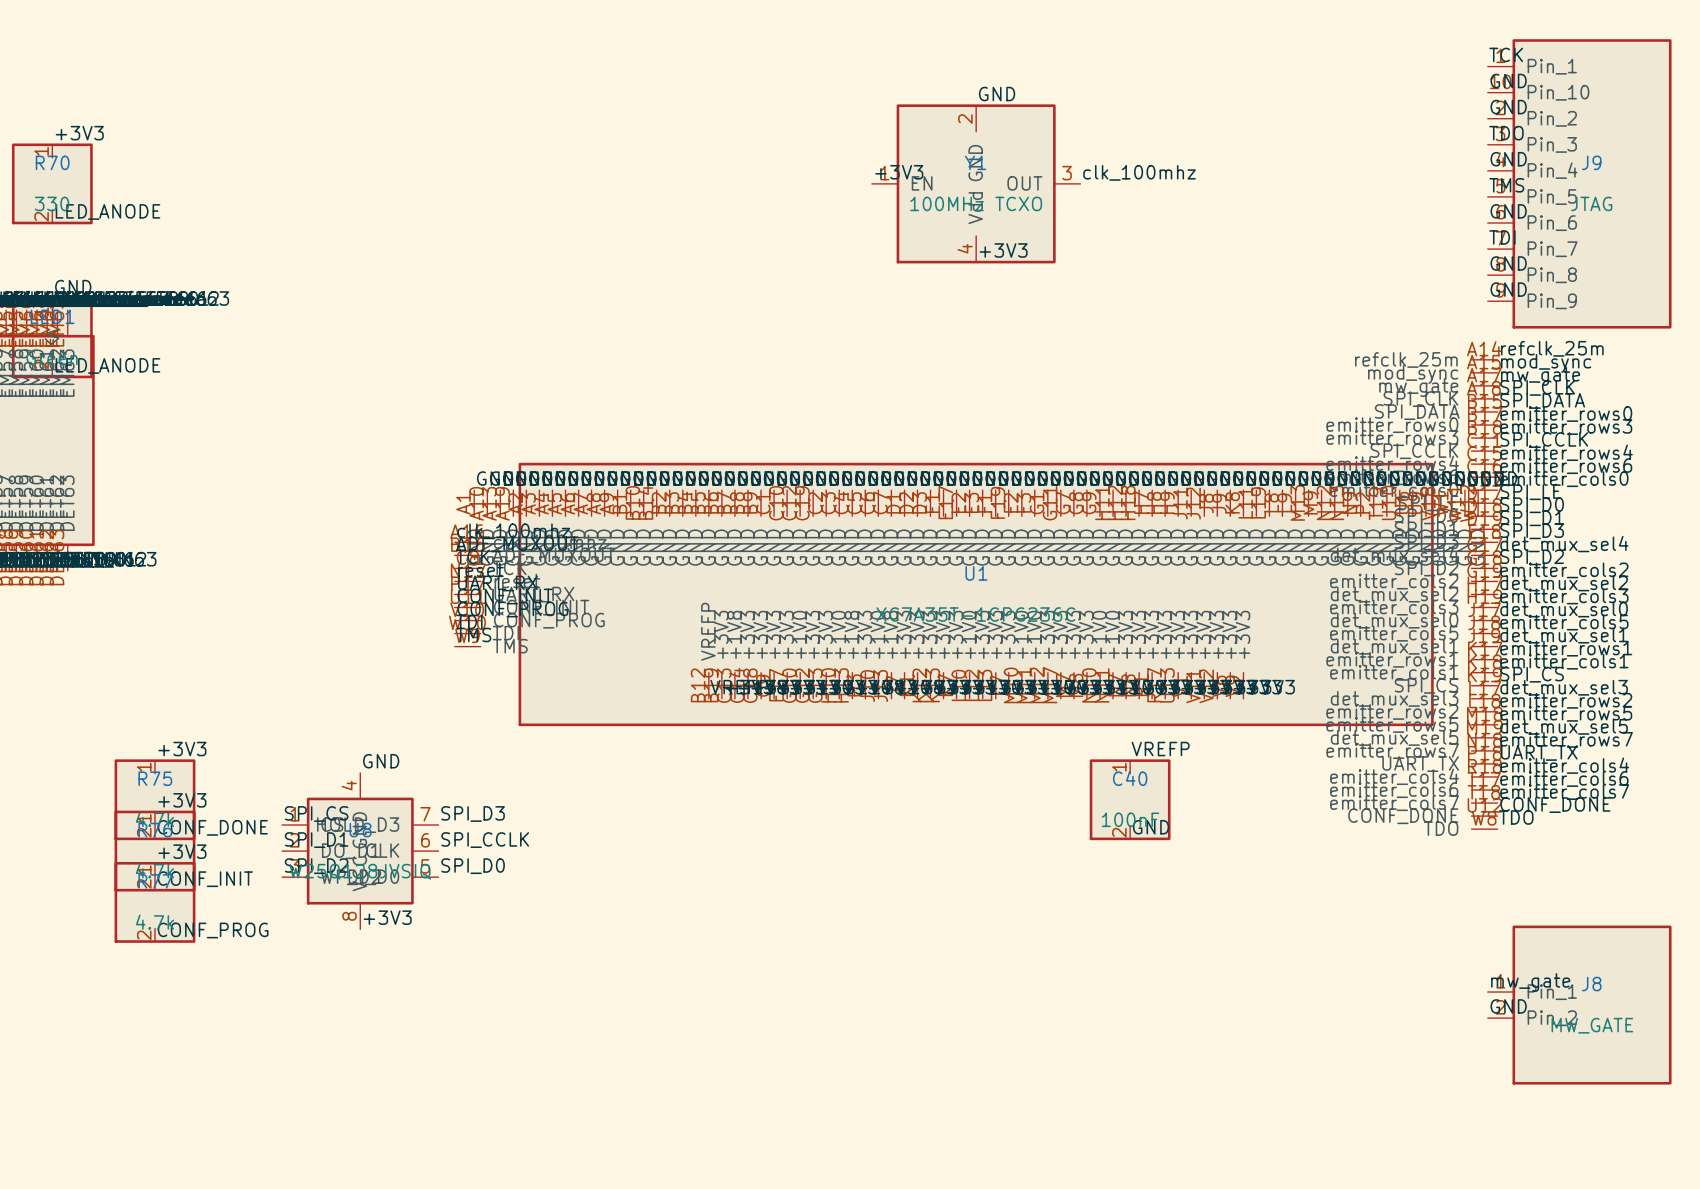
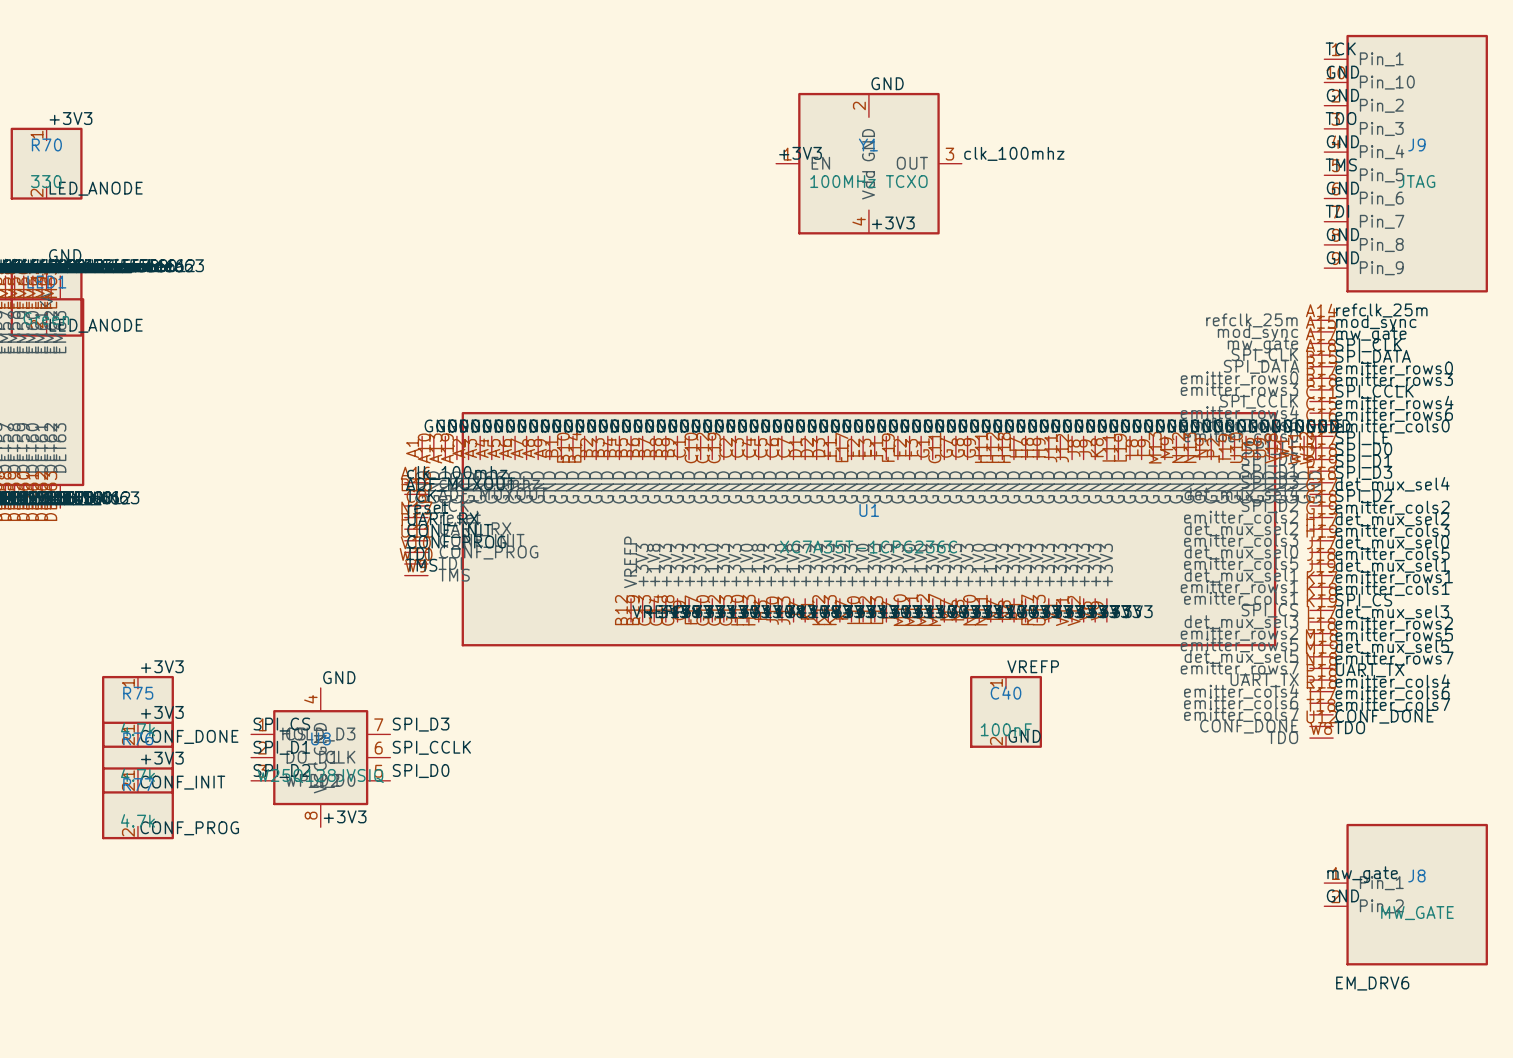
label: none -> EM_DRV6 (1372, 983)

